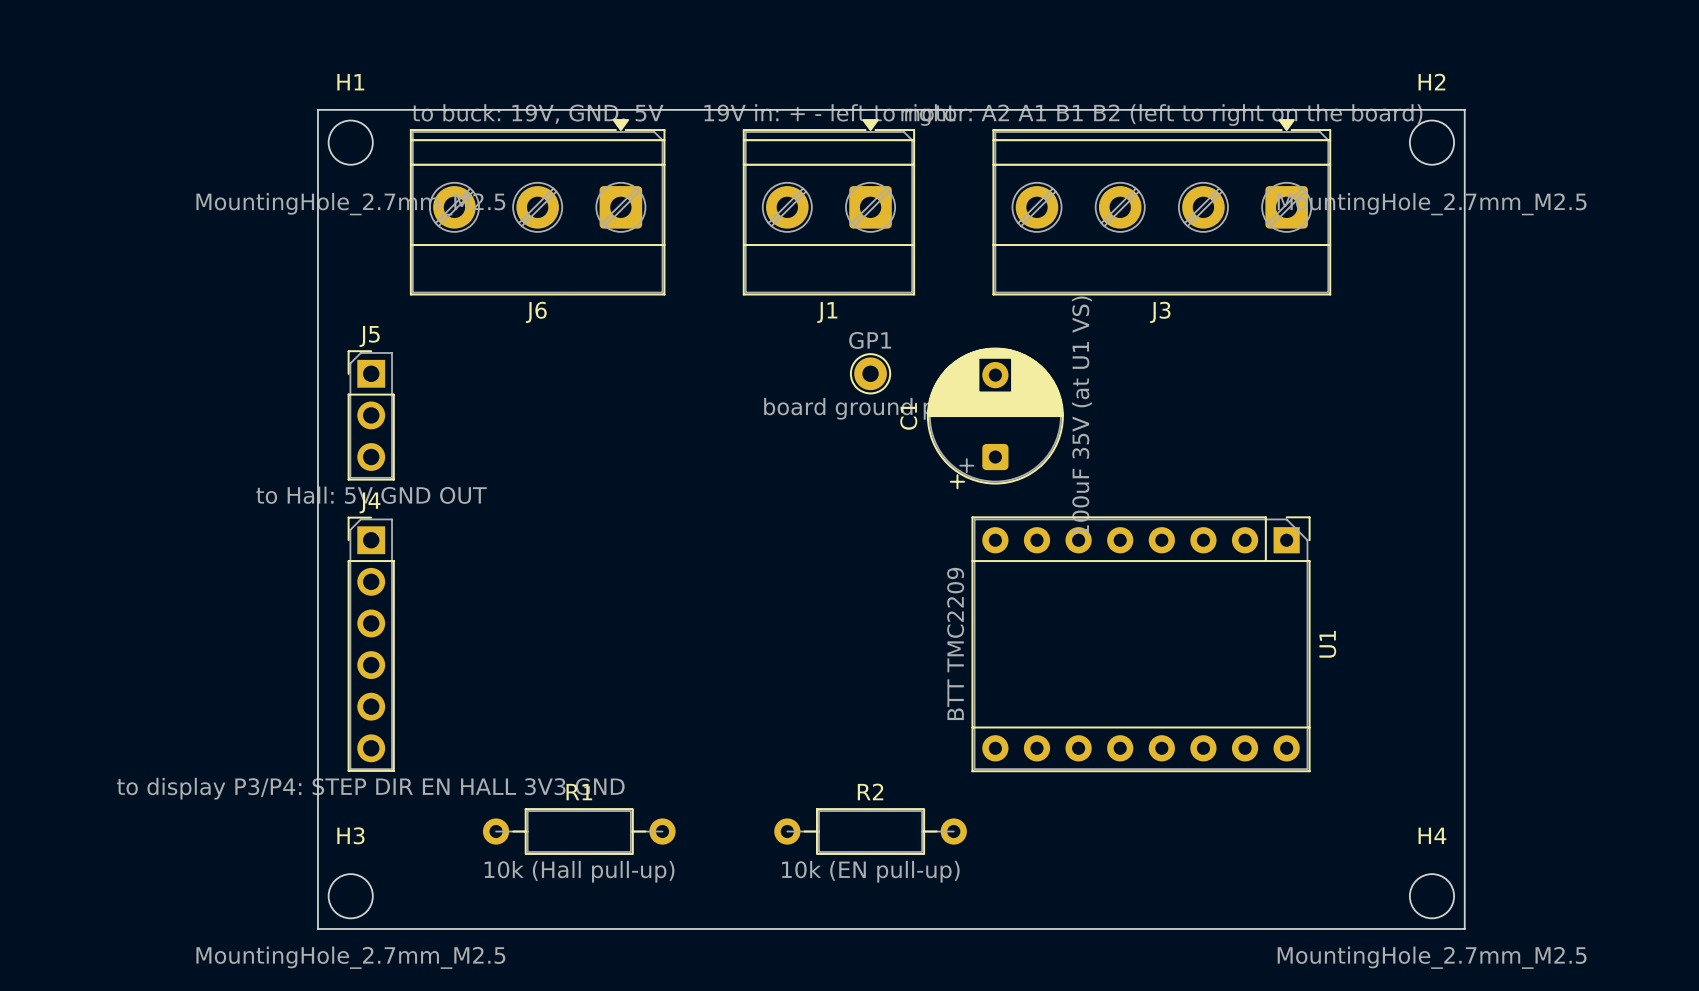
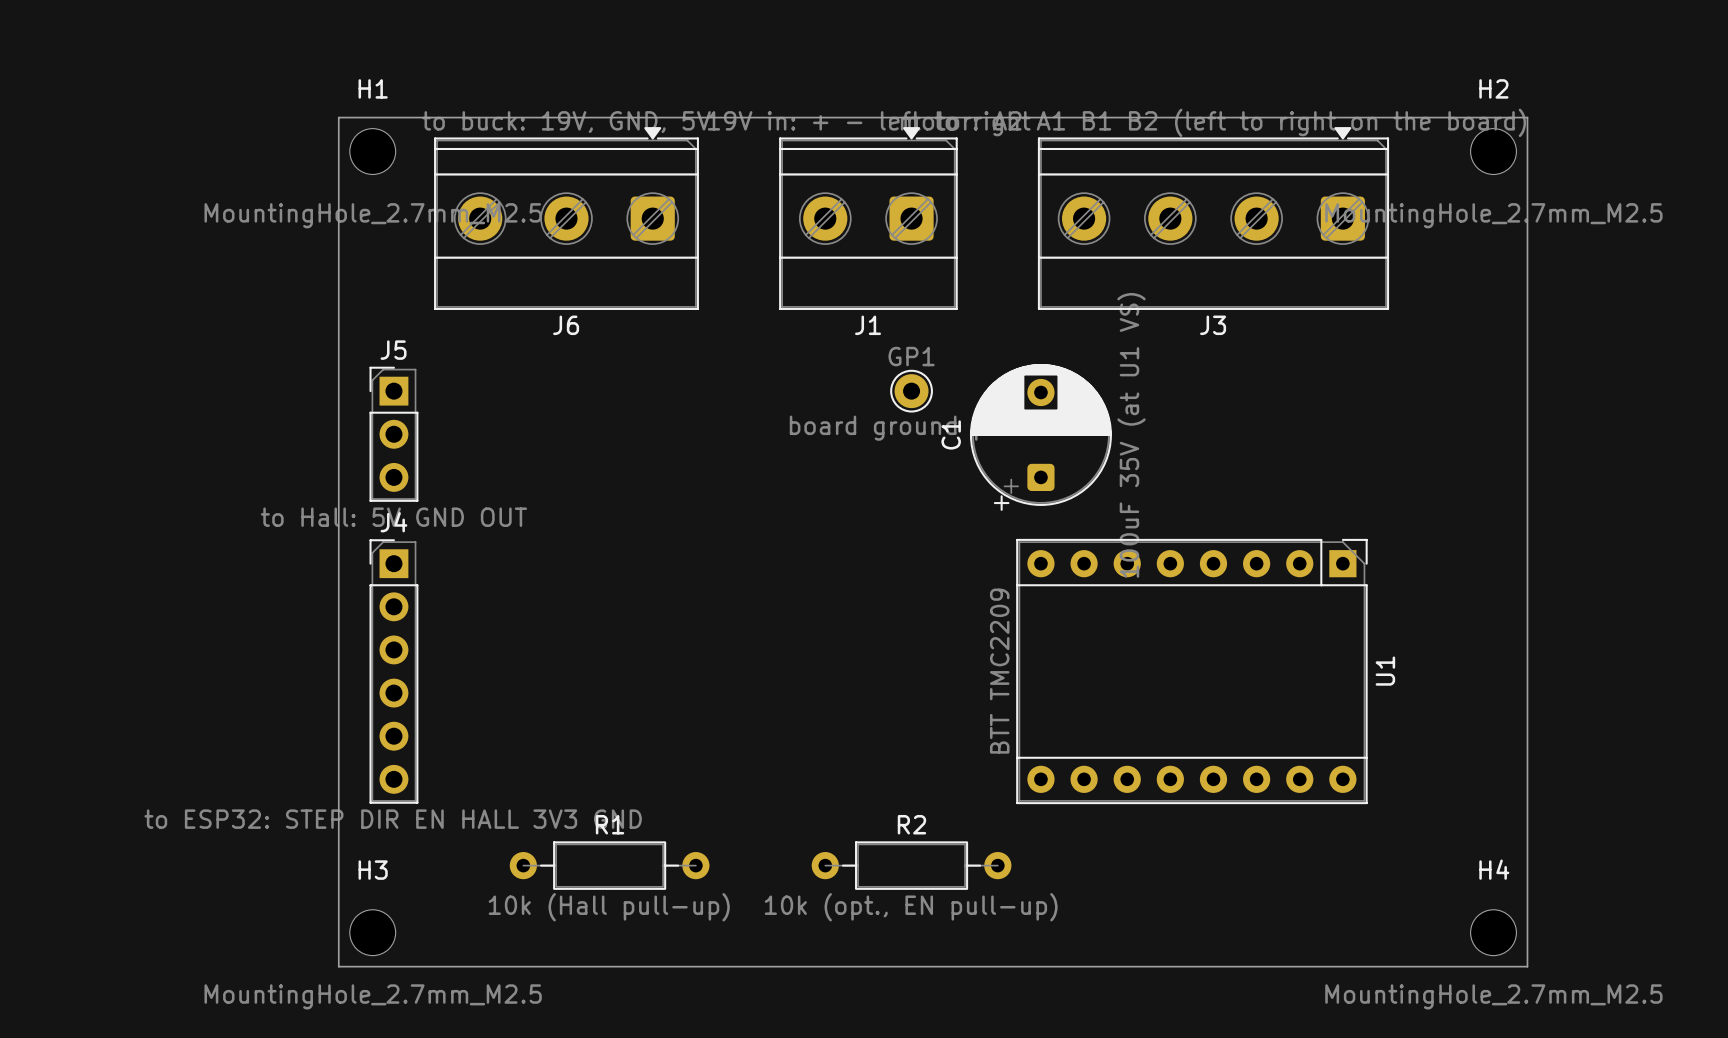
J4 value: to display P3/P4: STEP DIR EN HALL 3V3 GND (370, 788) -> to ESP32: STEP DIR EN HALL 3V3 GND (393, 819)
R2 value: 10k (EN pull-up) (870, 871) -> 10k (opt., EN pull-up) (911, 907)

